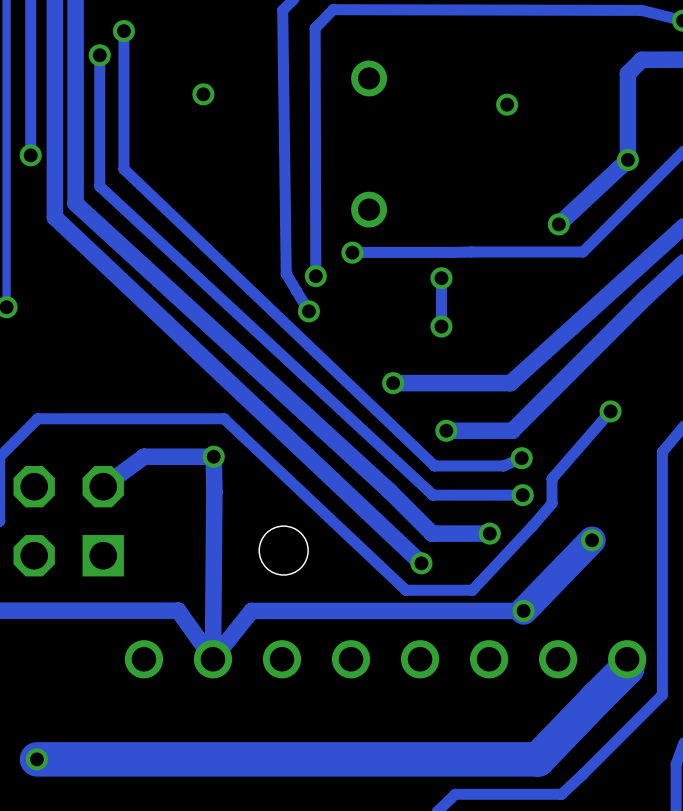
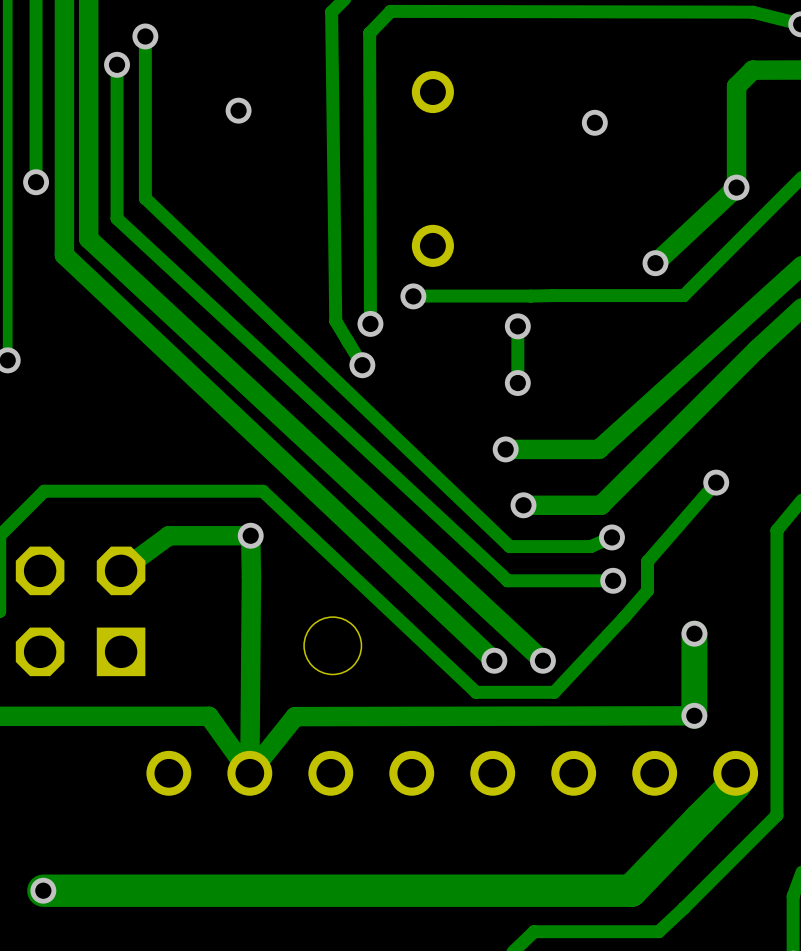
track: (75, 203) (389, 491) (432, 533) (489, 533) -> (88, 238) (542, 660)
via position: (393, 383) -> (505, 449)
track: (431, 383) (393, 383) -> none
via: (489, 533) -> none
track: (592, 540) (523, 610) (251, 610) -> (694, 633) (694, 715) (295, 716)
via: none -> (542, 660)
via: (523, 610) -> none
via: none -> (694, 715)
track width: thick (627, 659) (627, 668) (538, 759) (36, 759) -> thin (735, 773) (735, 783) (631, 890) (43, 890)

